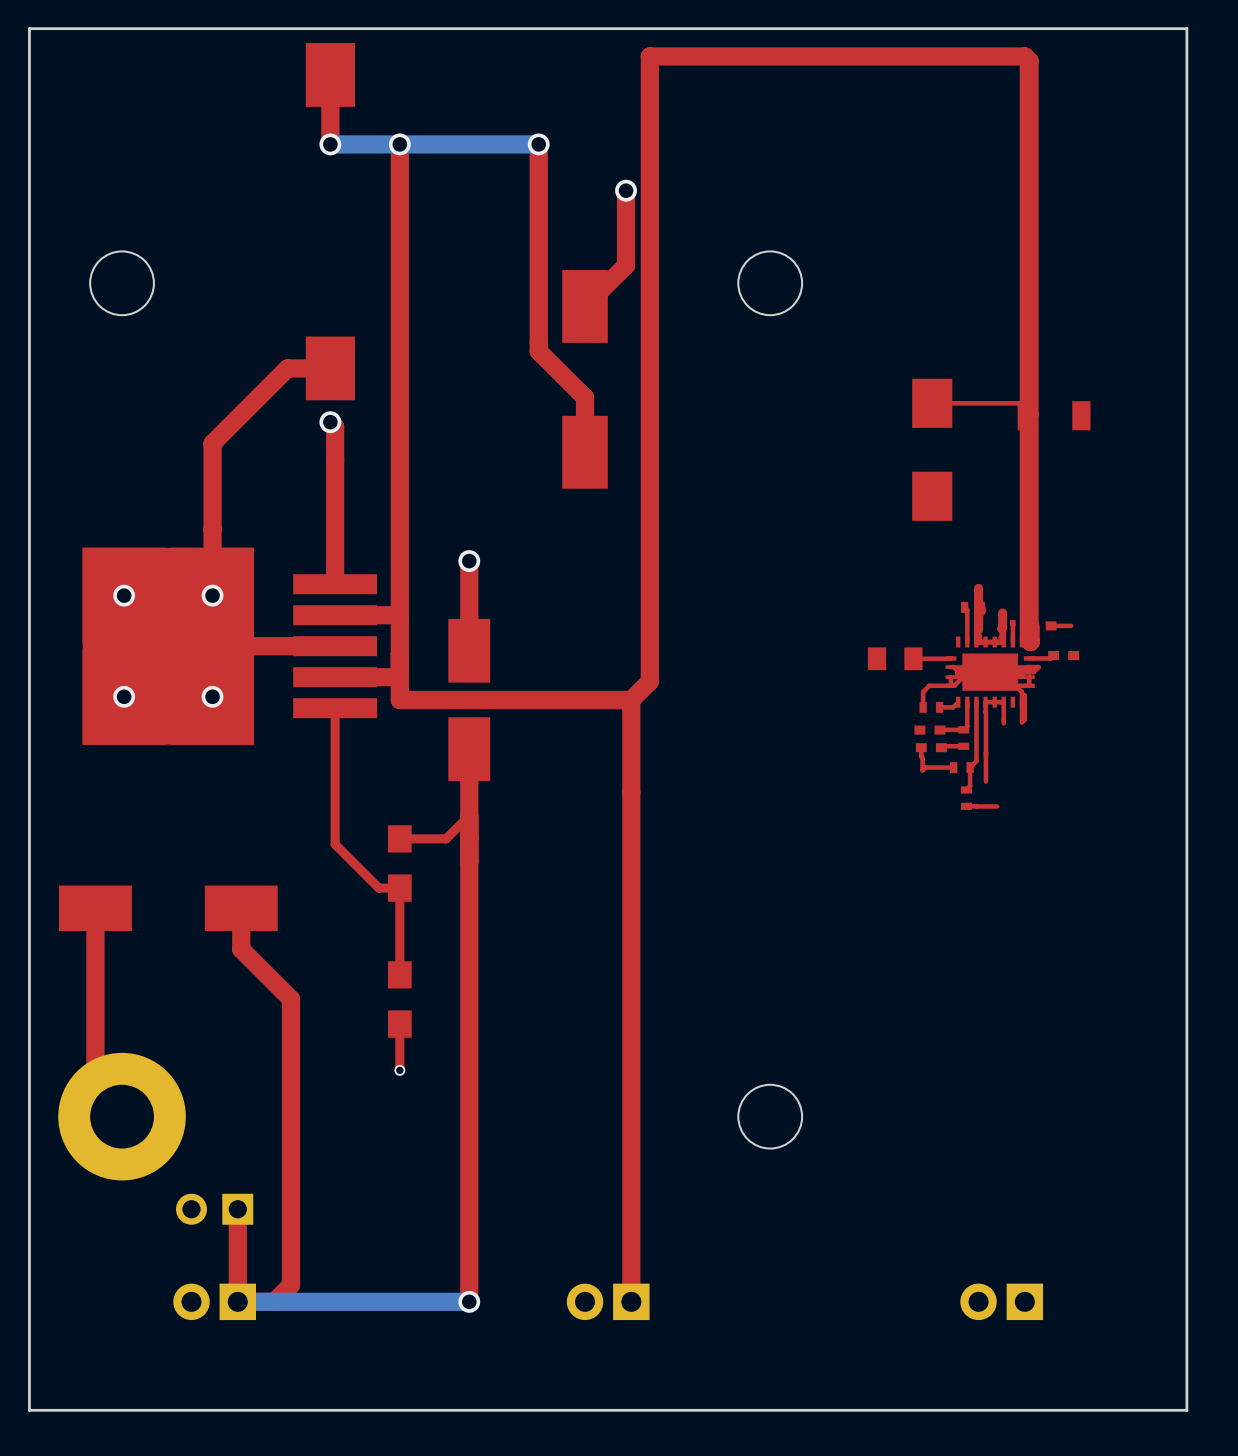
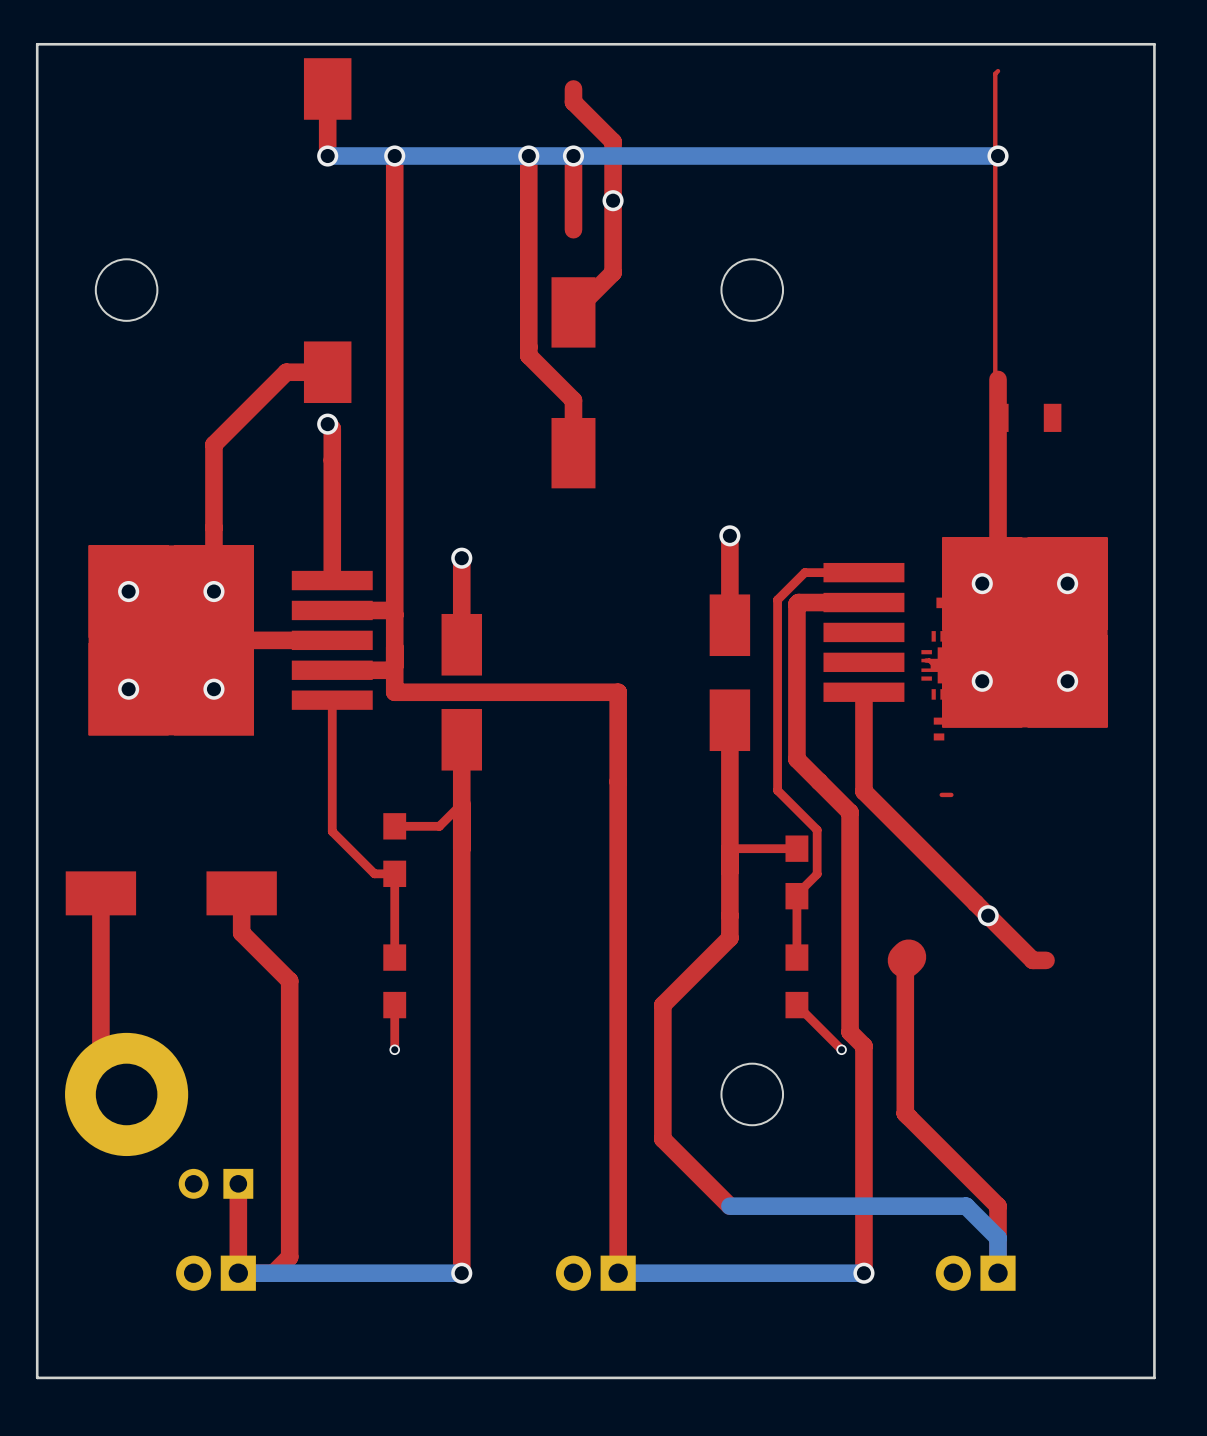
top track: none -> (573, 88) (573, 102) (613, 141) (613, 200)
top track: none -> (573, 156) (573, 229)
via: none -> (573, 156)
bottom track: none -> (998, 156) (528, 156)
via: none -> (998, 156)
top track: none -> (998, 379) (998, 567) (982, 583)
top track: (932, 403) (1018, 403) (1029, 414) -> none
part: (932, 449) -> none
top track: none -> (729, 535) (729, 625)
via: none -> (729, 535)
top track: none -> (863, 572) (804, 572) (777, 599) (777, 790) (817, 830) (817, 874) (796, 894) (796, 957)
via: none -> (982, 583)
via: none -> (1067, 583)
top track: (978, 588) (978, 629) -> none
top track: none -> (863, 602) (798, 602) (796, 604) (796, 759) (850, 812) (850, 1032) (863, 1046) (863, 1273)
top track: (964, 607) (967, 610) (967, 642) -> none
top track: (1002, 612) (1001, 628) -> none
top track: (1012, 623) (1012, 642) -> none
top track: (1071, 625) (1051, 625) -> none
top track: (1030, 627) (1030, 642) (1029, 61) (1024, 56) (649, 56) (649, 681) (631, 699) -> none
part: none -> (965, 632)
top track: (1053, 655) (1050, 658) (1029, 658) -> none
part: (1063, 655) -> none
part: (895, 658) -> none
top track: (950, 658) (913, 658) -> none
top track: (1033, 669) (1025, 669) (1028, 667) (1038, 667) (1033, 672) (1021, 672) -> none
top track: (1000, 671) (1022, 692) (1022, 722) (1024, 719) (1024, 695) -> none
top track: (966, 672) (954, 685) (929, 685) (923, 691) (923, 707) -> none
top track: (950, 677) (950, 685) -> none
part: none -> (729, 672)
via: none -> (982, 681)
via: none -> (1067, 681)
top track: none -> (863, 692) (863, 791) (1032, 960) (1046, 960)
top track: (958, 702) (953, 707) (939, 707) -> none
top track: (967, 702) (967, 726) (963, 729) (940, 729) -> none
top track: (976, 702) (976, 761) (970, 767) (970, 786) (966, 789) -> none
part: (931, 707) -> none
top track: (1003, 723) (1003, 702) (985, 702) (985, 781) -> none
top track: none -> (729, 720) (729, 938) (662, 1005) (662, 1139) (729, 1206)
part: (929, 730) -> none
top track: (963, 746) (941, 747) -> none
top track: (921, 747) (922, 770) (925, 767) (953, 767) -> none
part: (931, 747) -> none
part: (961, 767) -> none
part: (966, 798) -> none
top track: (997, 806) (976, 806) -> none
top track: none -> (796, 848) (729, 848)
part: none -> (796, 872)
via: none -> (988, 915)
top track: none -> (908, 957) (905, 960) (905, 1113) (998, 1206) (998, 1273)
part: none -> (796, 981)
top track: none -> (796, 1005) (841, 1049)
via: none -> (841, 1049)
bottom track: none -> (729, 1206) (966, 1206) (998, 1238) (998, 1273)
bottom track: none -> (863, 1273) (618, 1273)
via: none -> (863, 1273)

